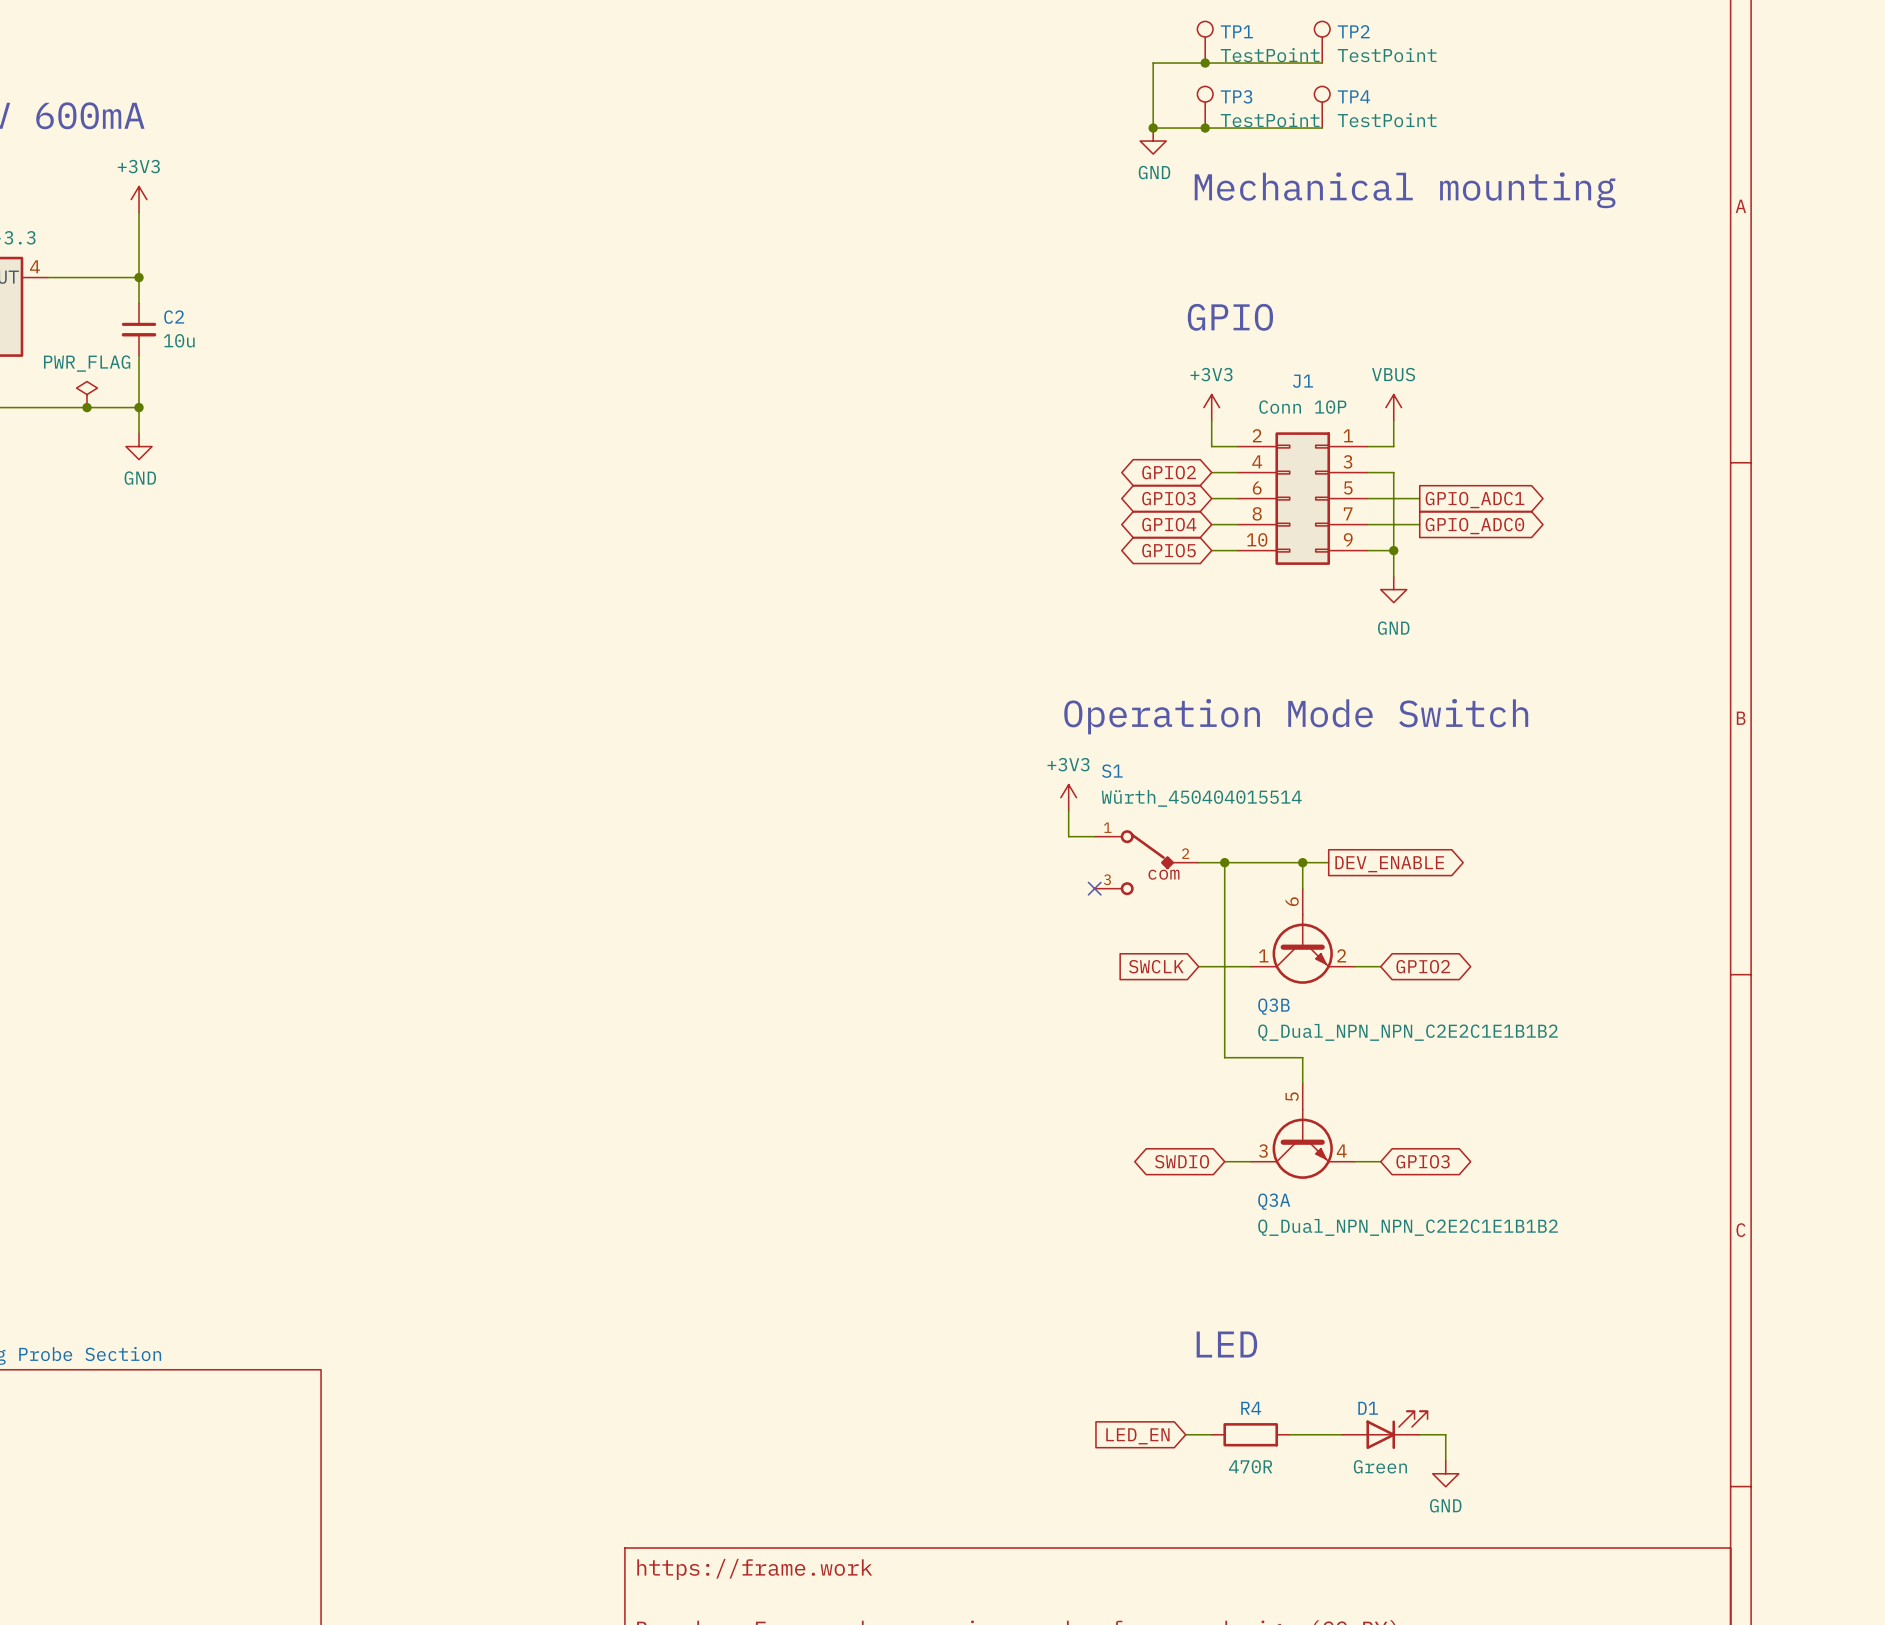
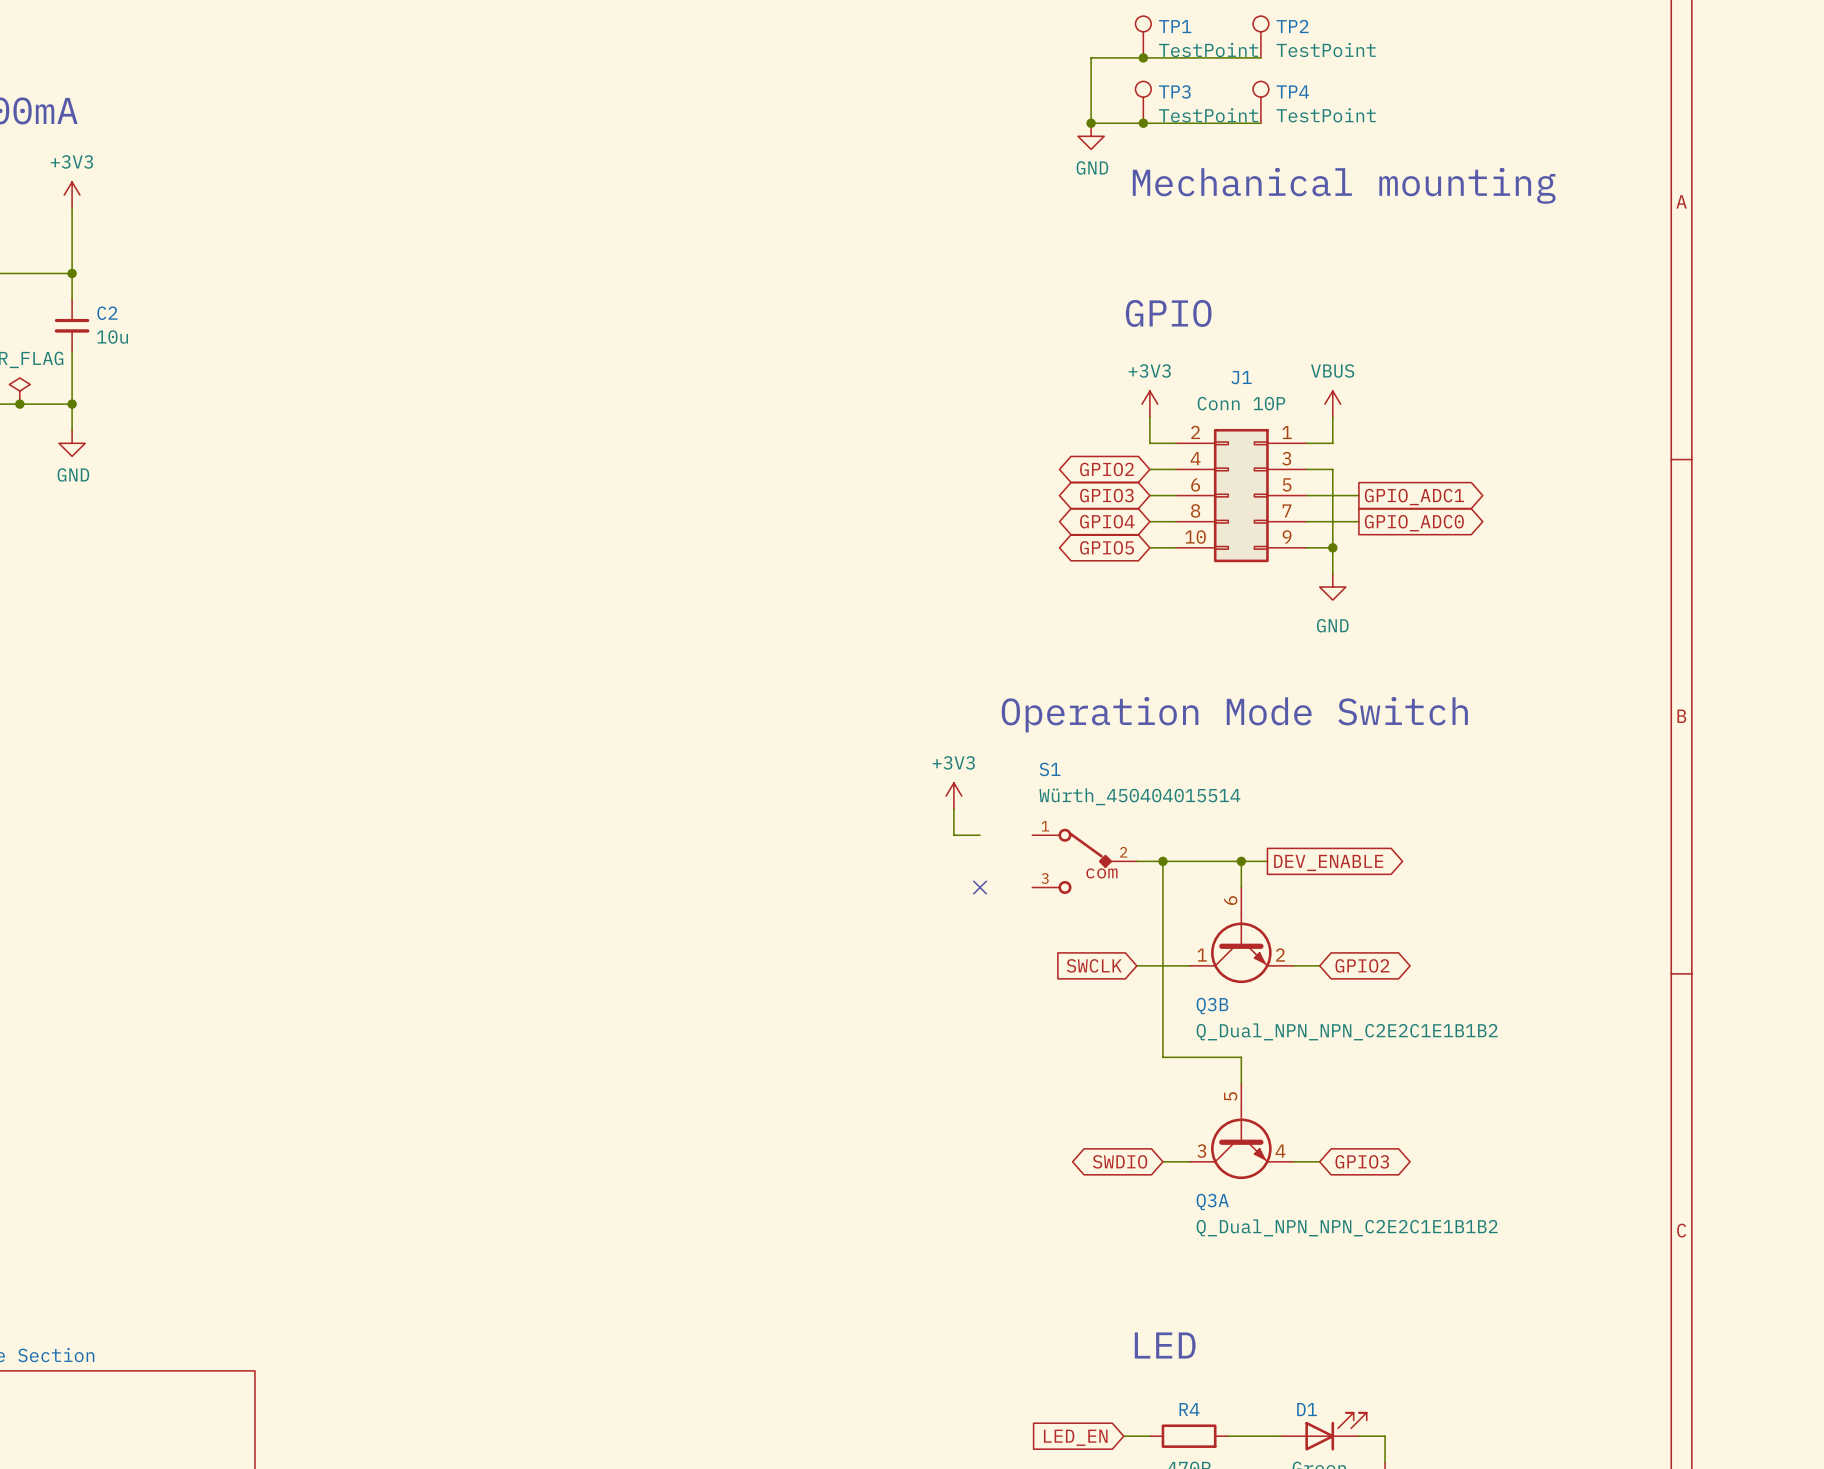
power symbol position: +3V3 (1068, 797) -> +3V3 (953, 796)
wire: (1068, 810) (1068, 836) (1094, 836) -> (953, 809) (953, 835) (980, 835)
no-connect mark position: (1094, 888) -> (980, 887)

